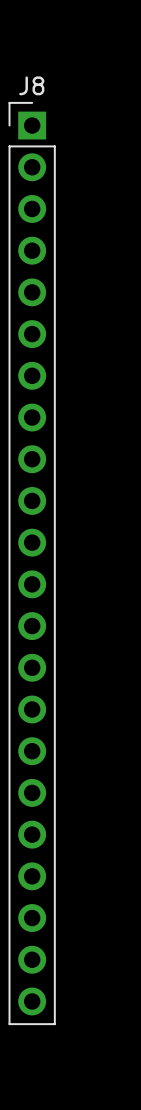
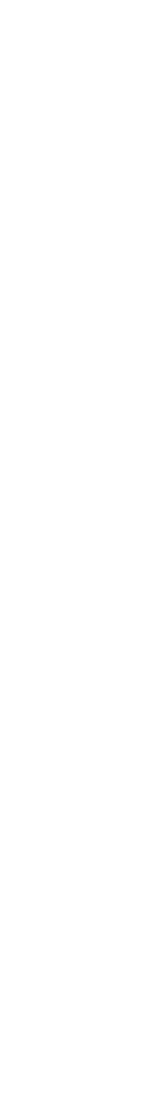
J8: (32, 563) -> none

